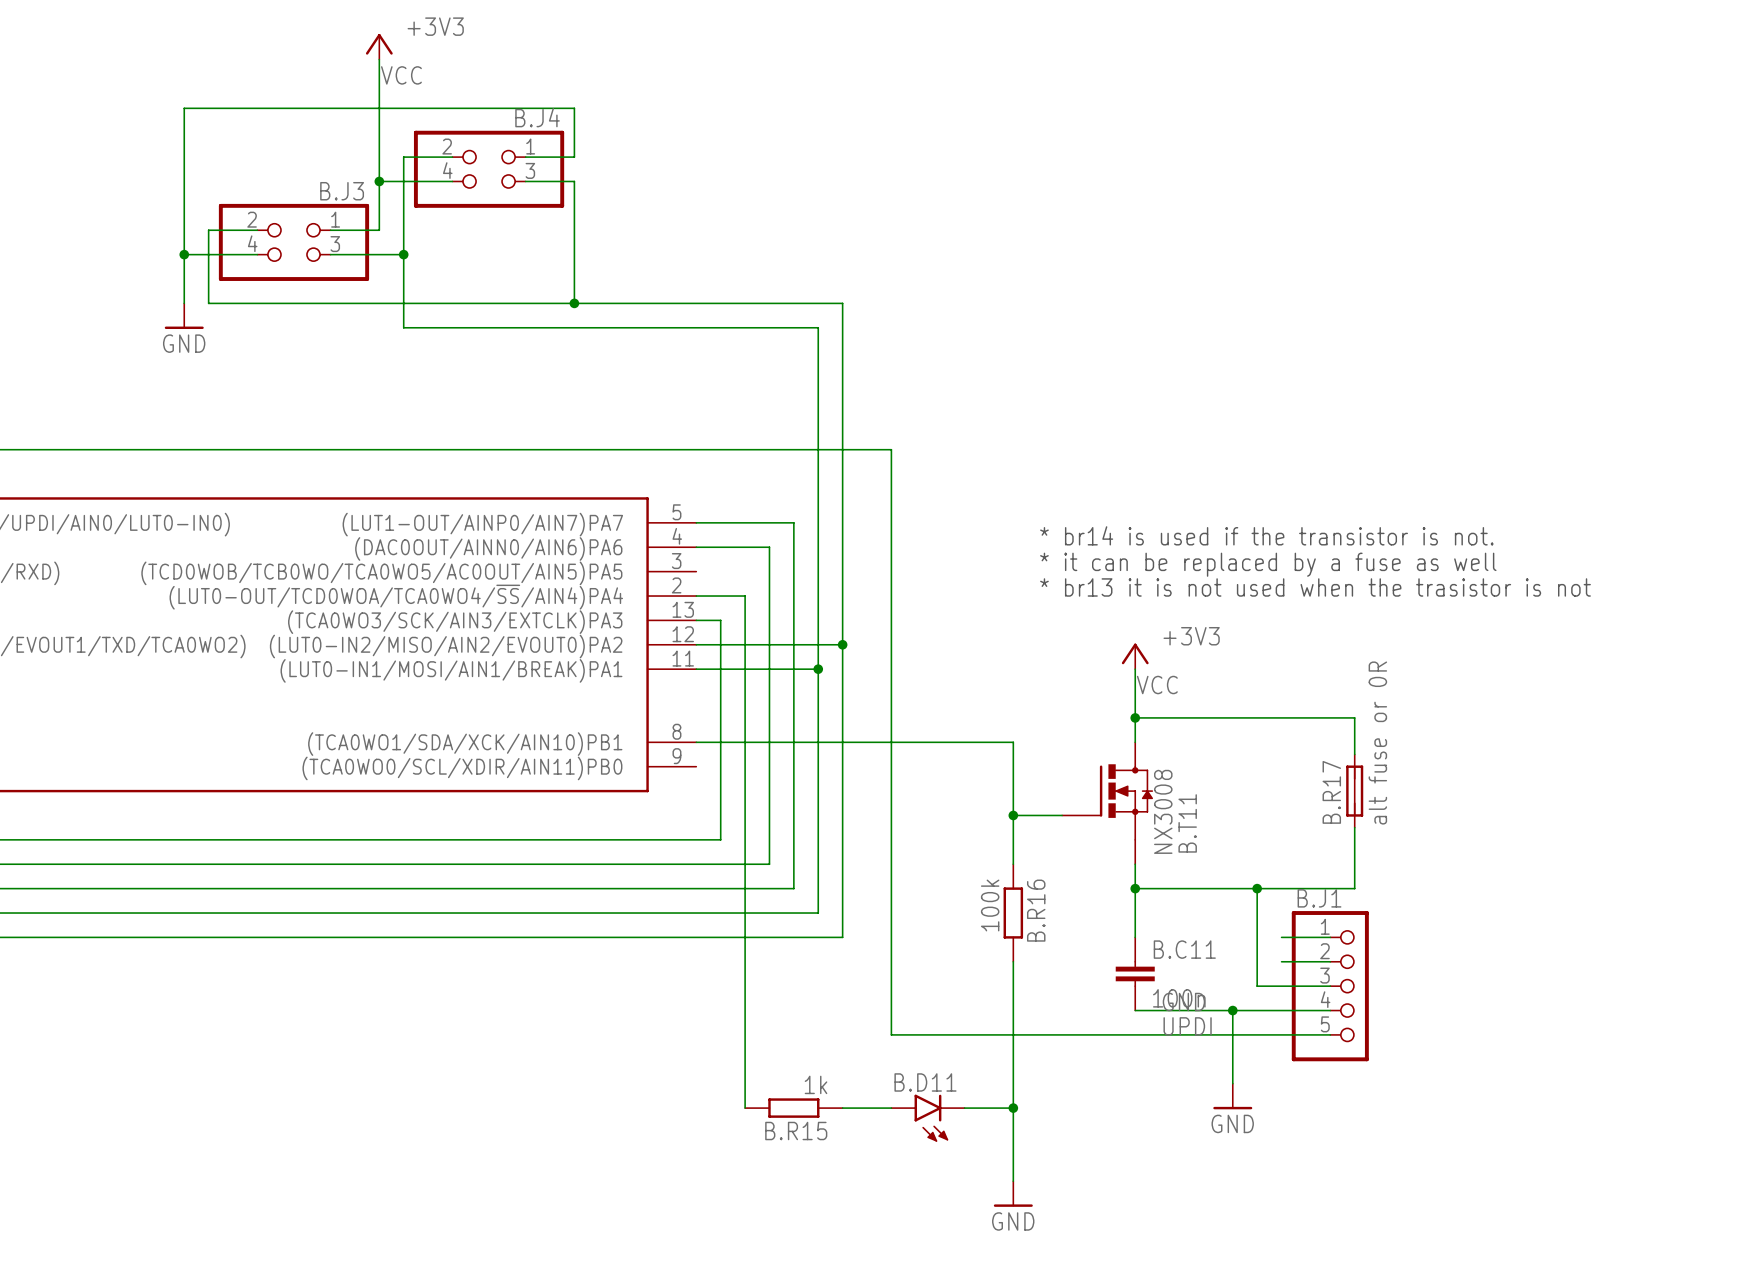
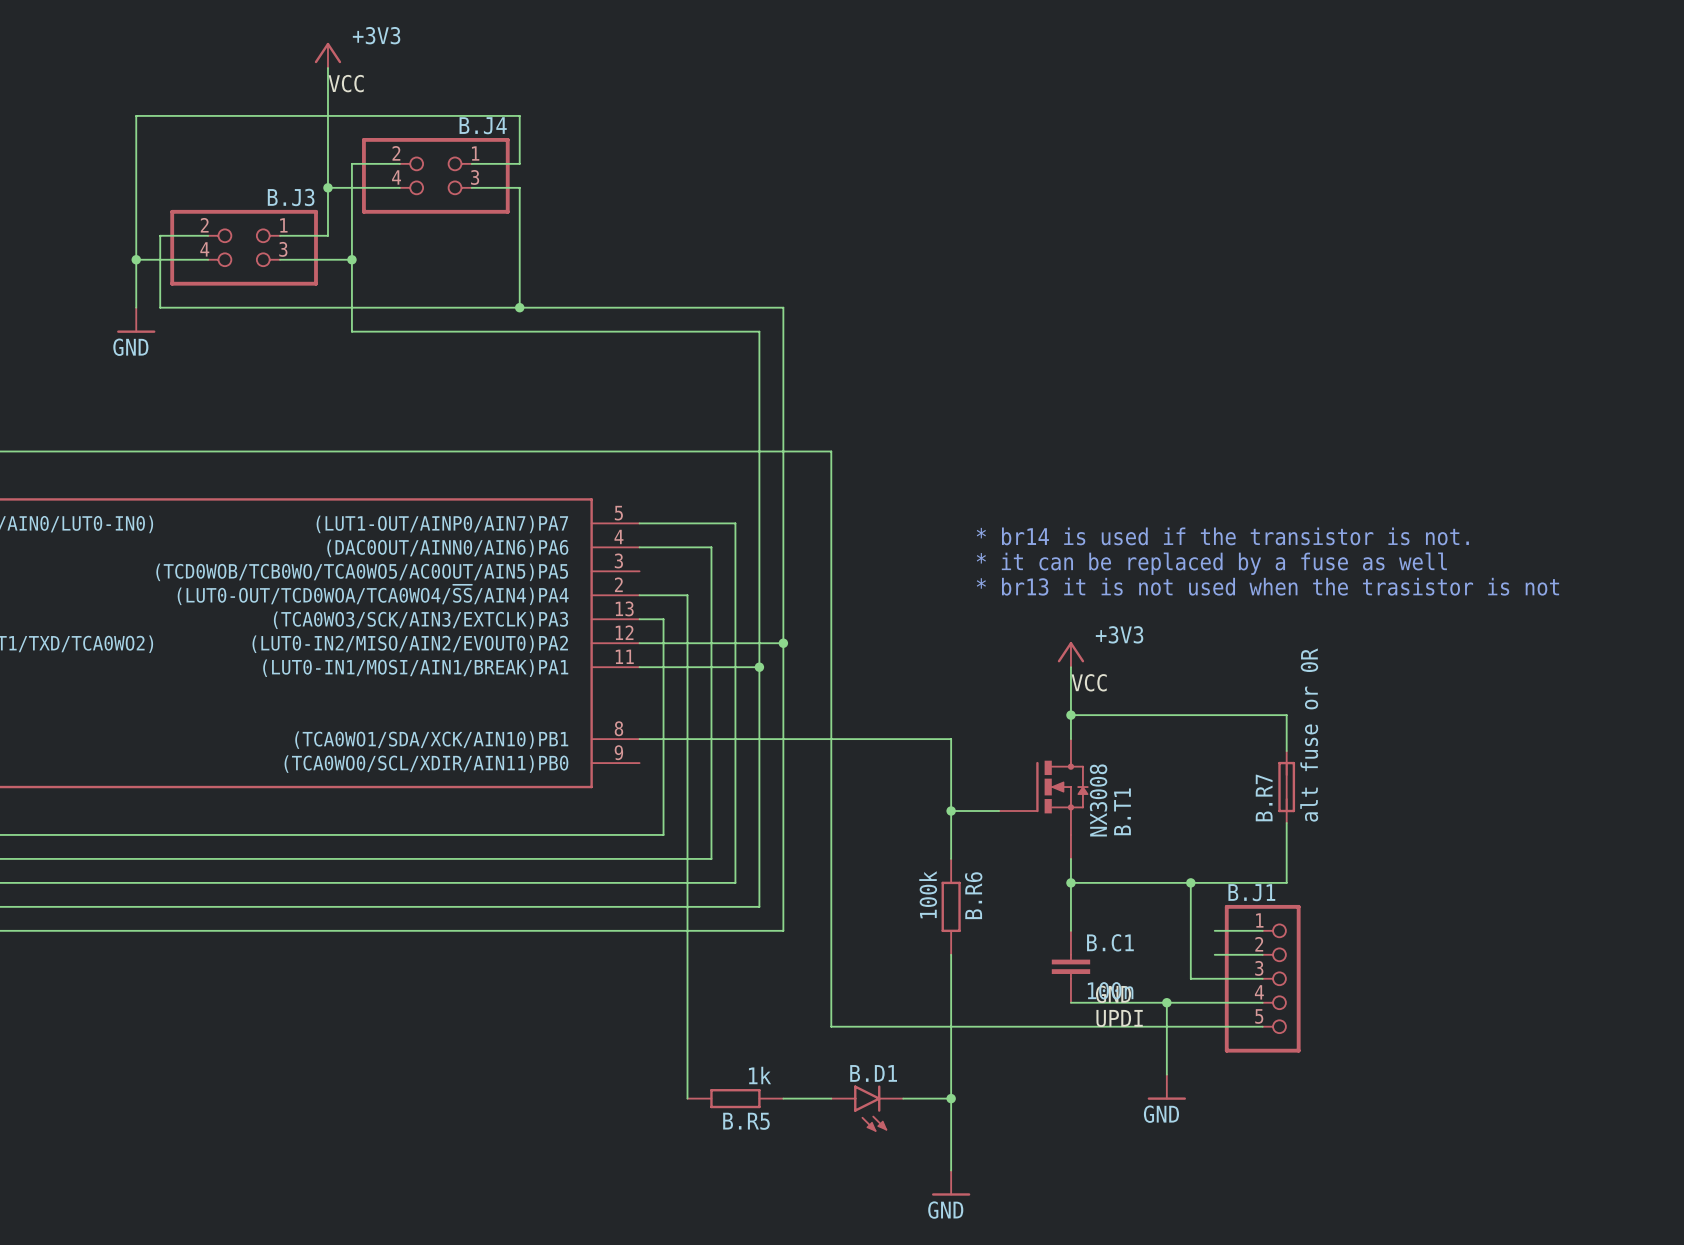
B.R17 name: B.R17 (1331, 792) -> B.R7 (1264, 797)
B.T11 name: B.T11 (1187, 823) -> B.T1 (1122, 811)
B.R16 name: B.R16 (1036, 910) -> B.R6 (973, 895)
B.C11 name: B.C11 (1184, 949) -> B.C1 (1110, 942)
B.D11 name: B.D11 (925, 1082) -> B.D1 (873, 1073)
B.R15 name: B.R15 (796, 1131) -> B.R5 (746, 1121)

